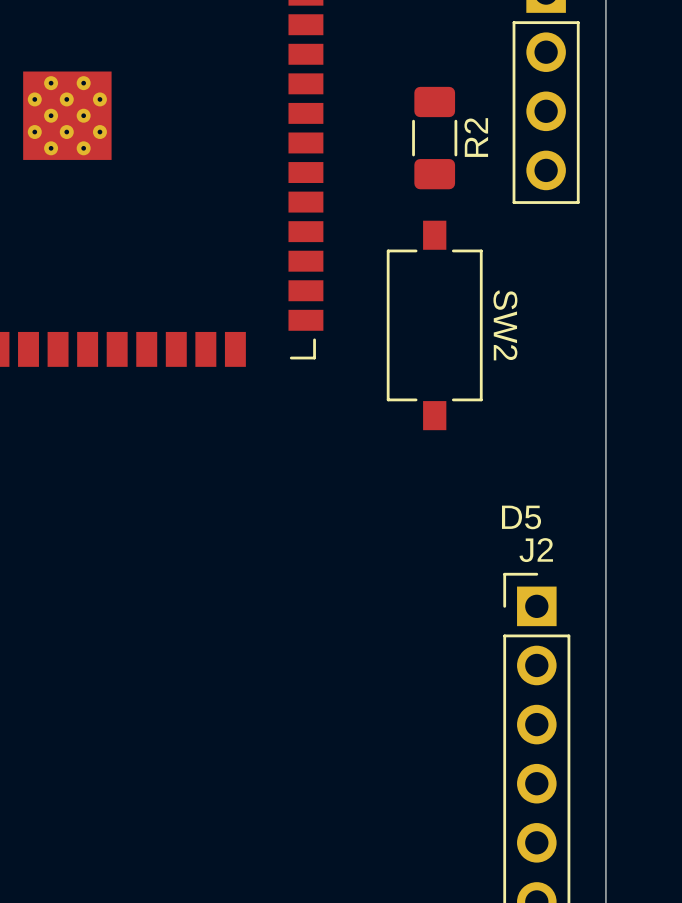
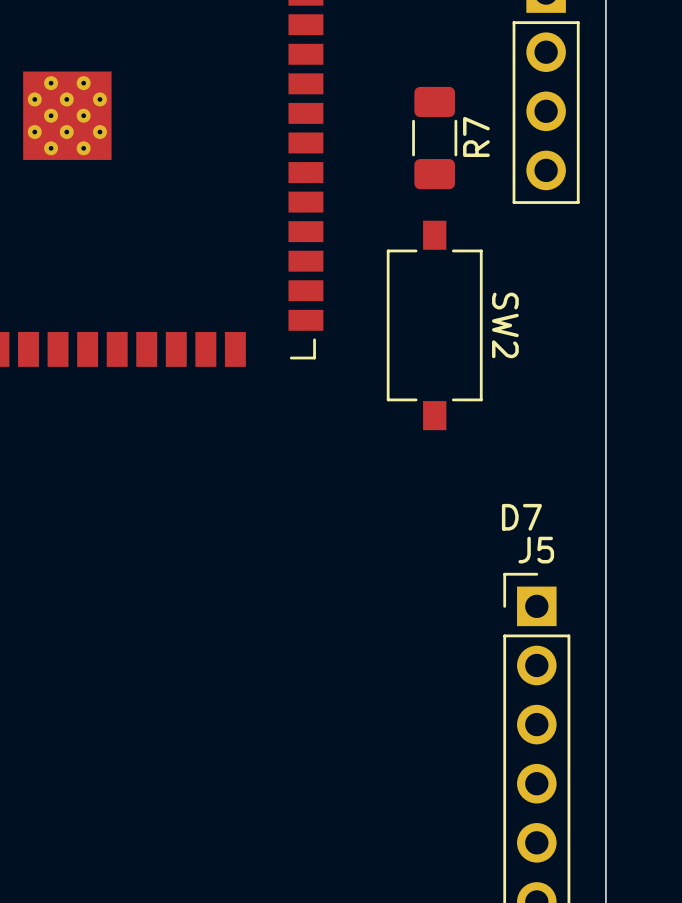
R2 name: R2 (476, 137) -> R7 (476, 136)
D5 name: D5 (521, 517) -> D7 (521, 517)
J2 name: J2 (536, 550) -> J5 (536, 550)

